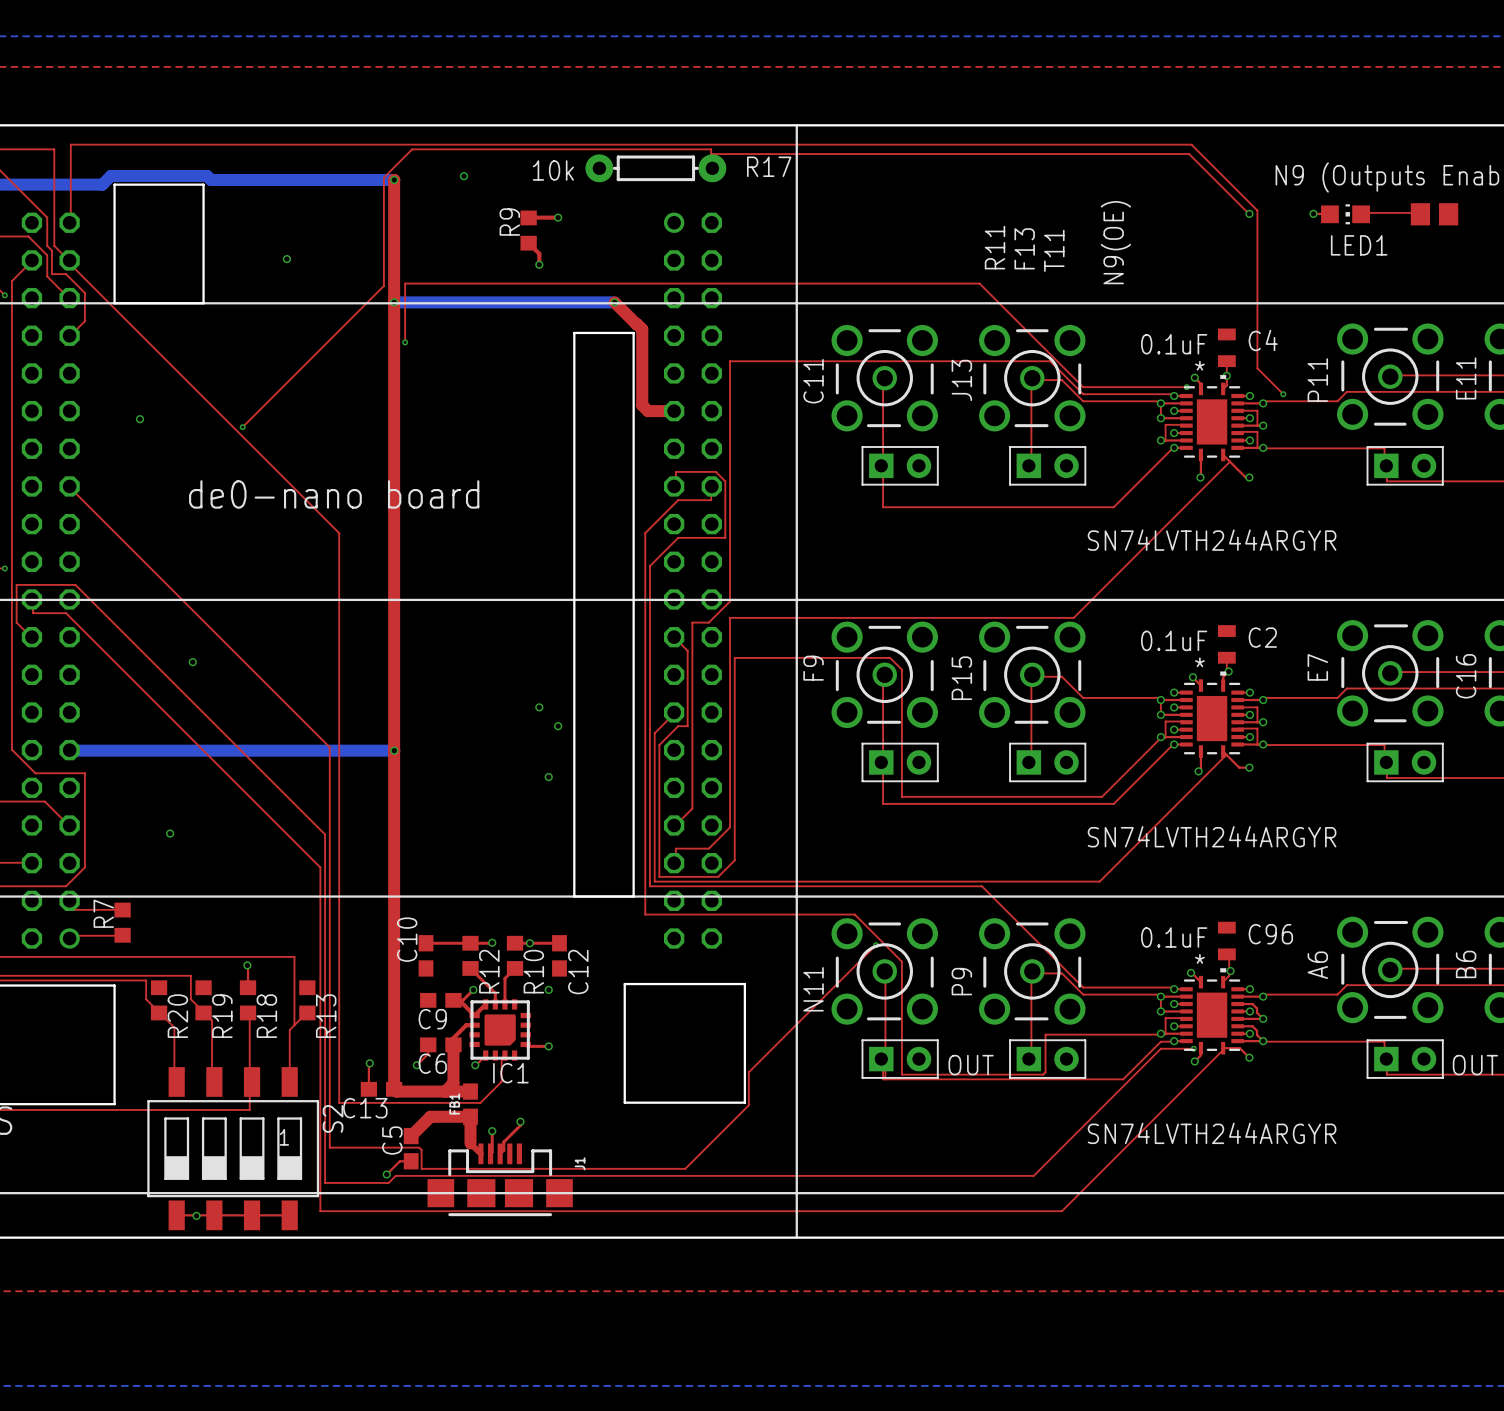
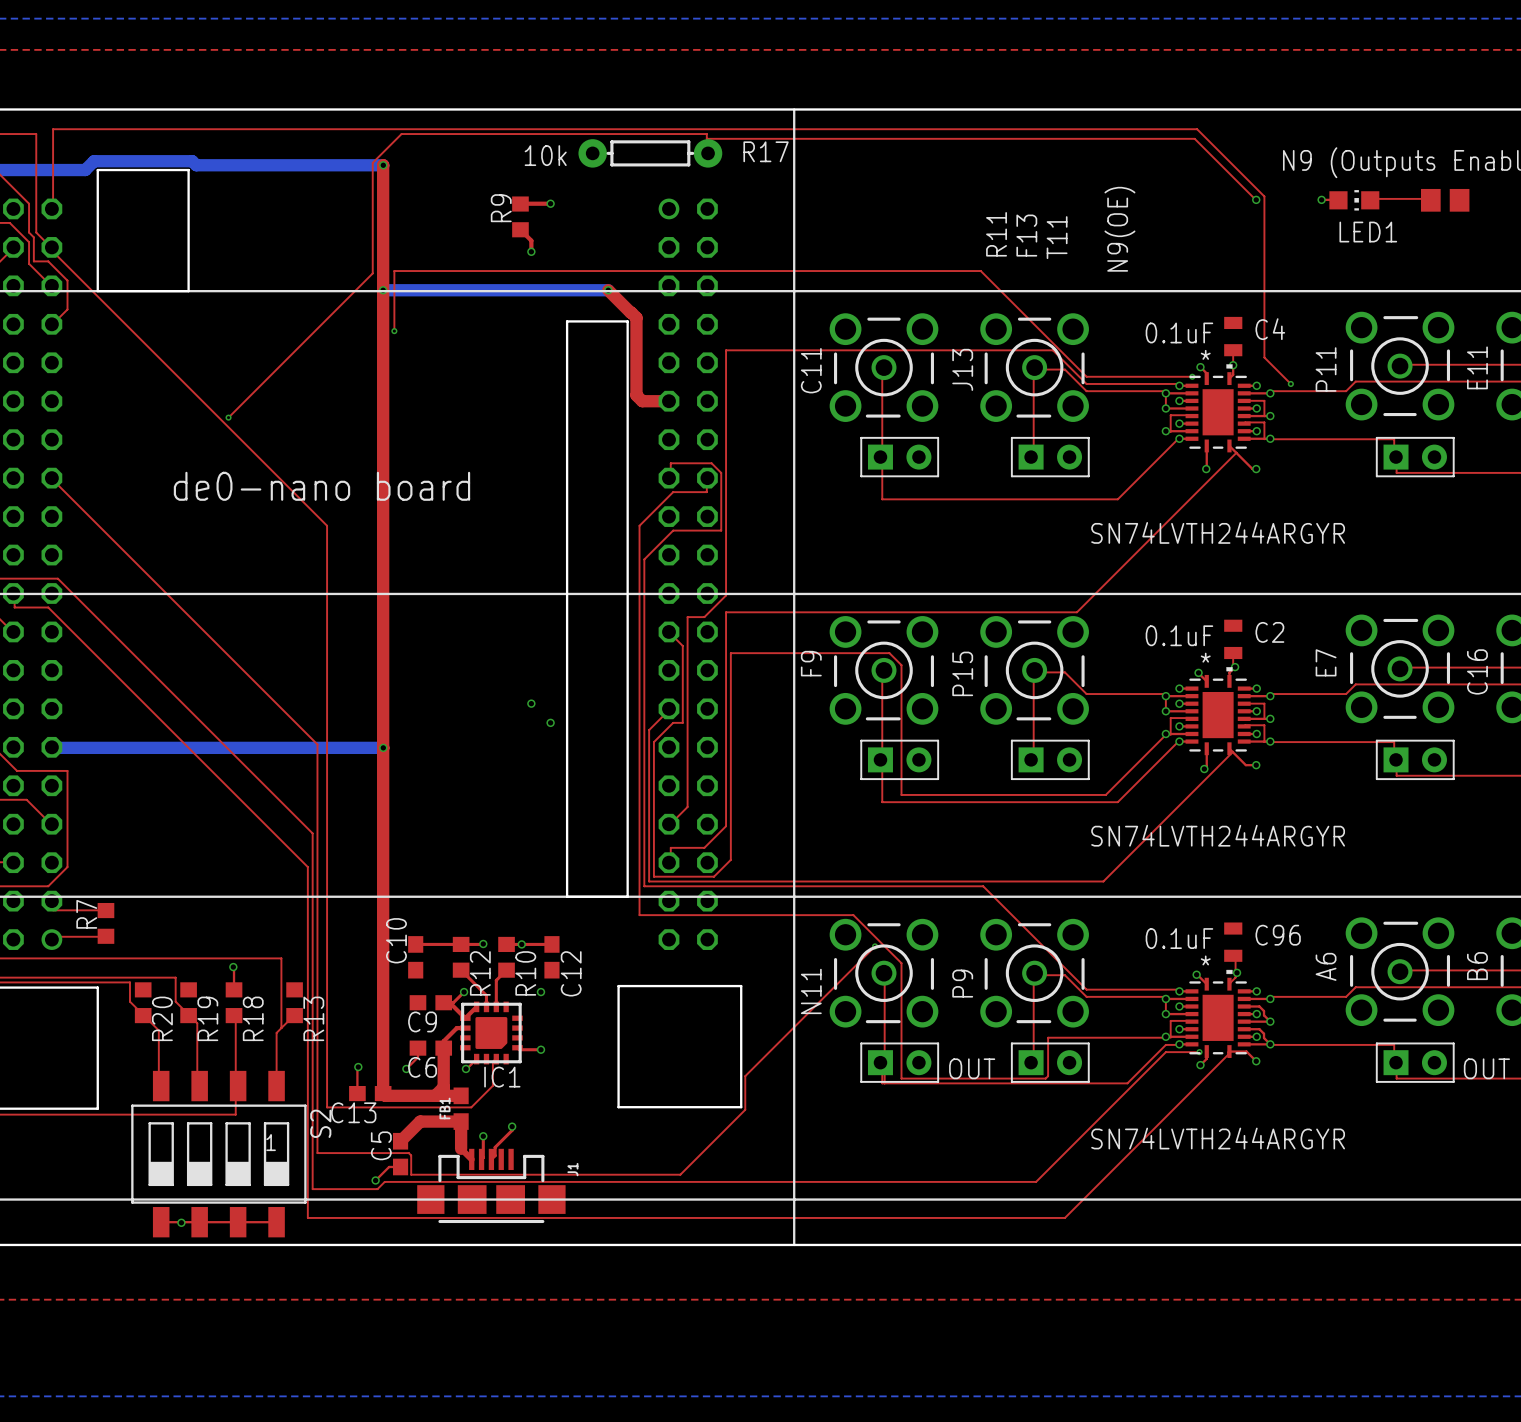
via: (463, 176) -> none
via: (286, 259) -> none
via: (140, 419) -> none
via: (192, 662) -> none
via: (548, 777) -> none
via: (170, 833) -> none

